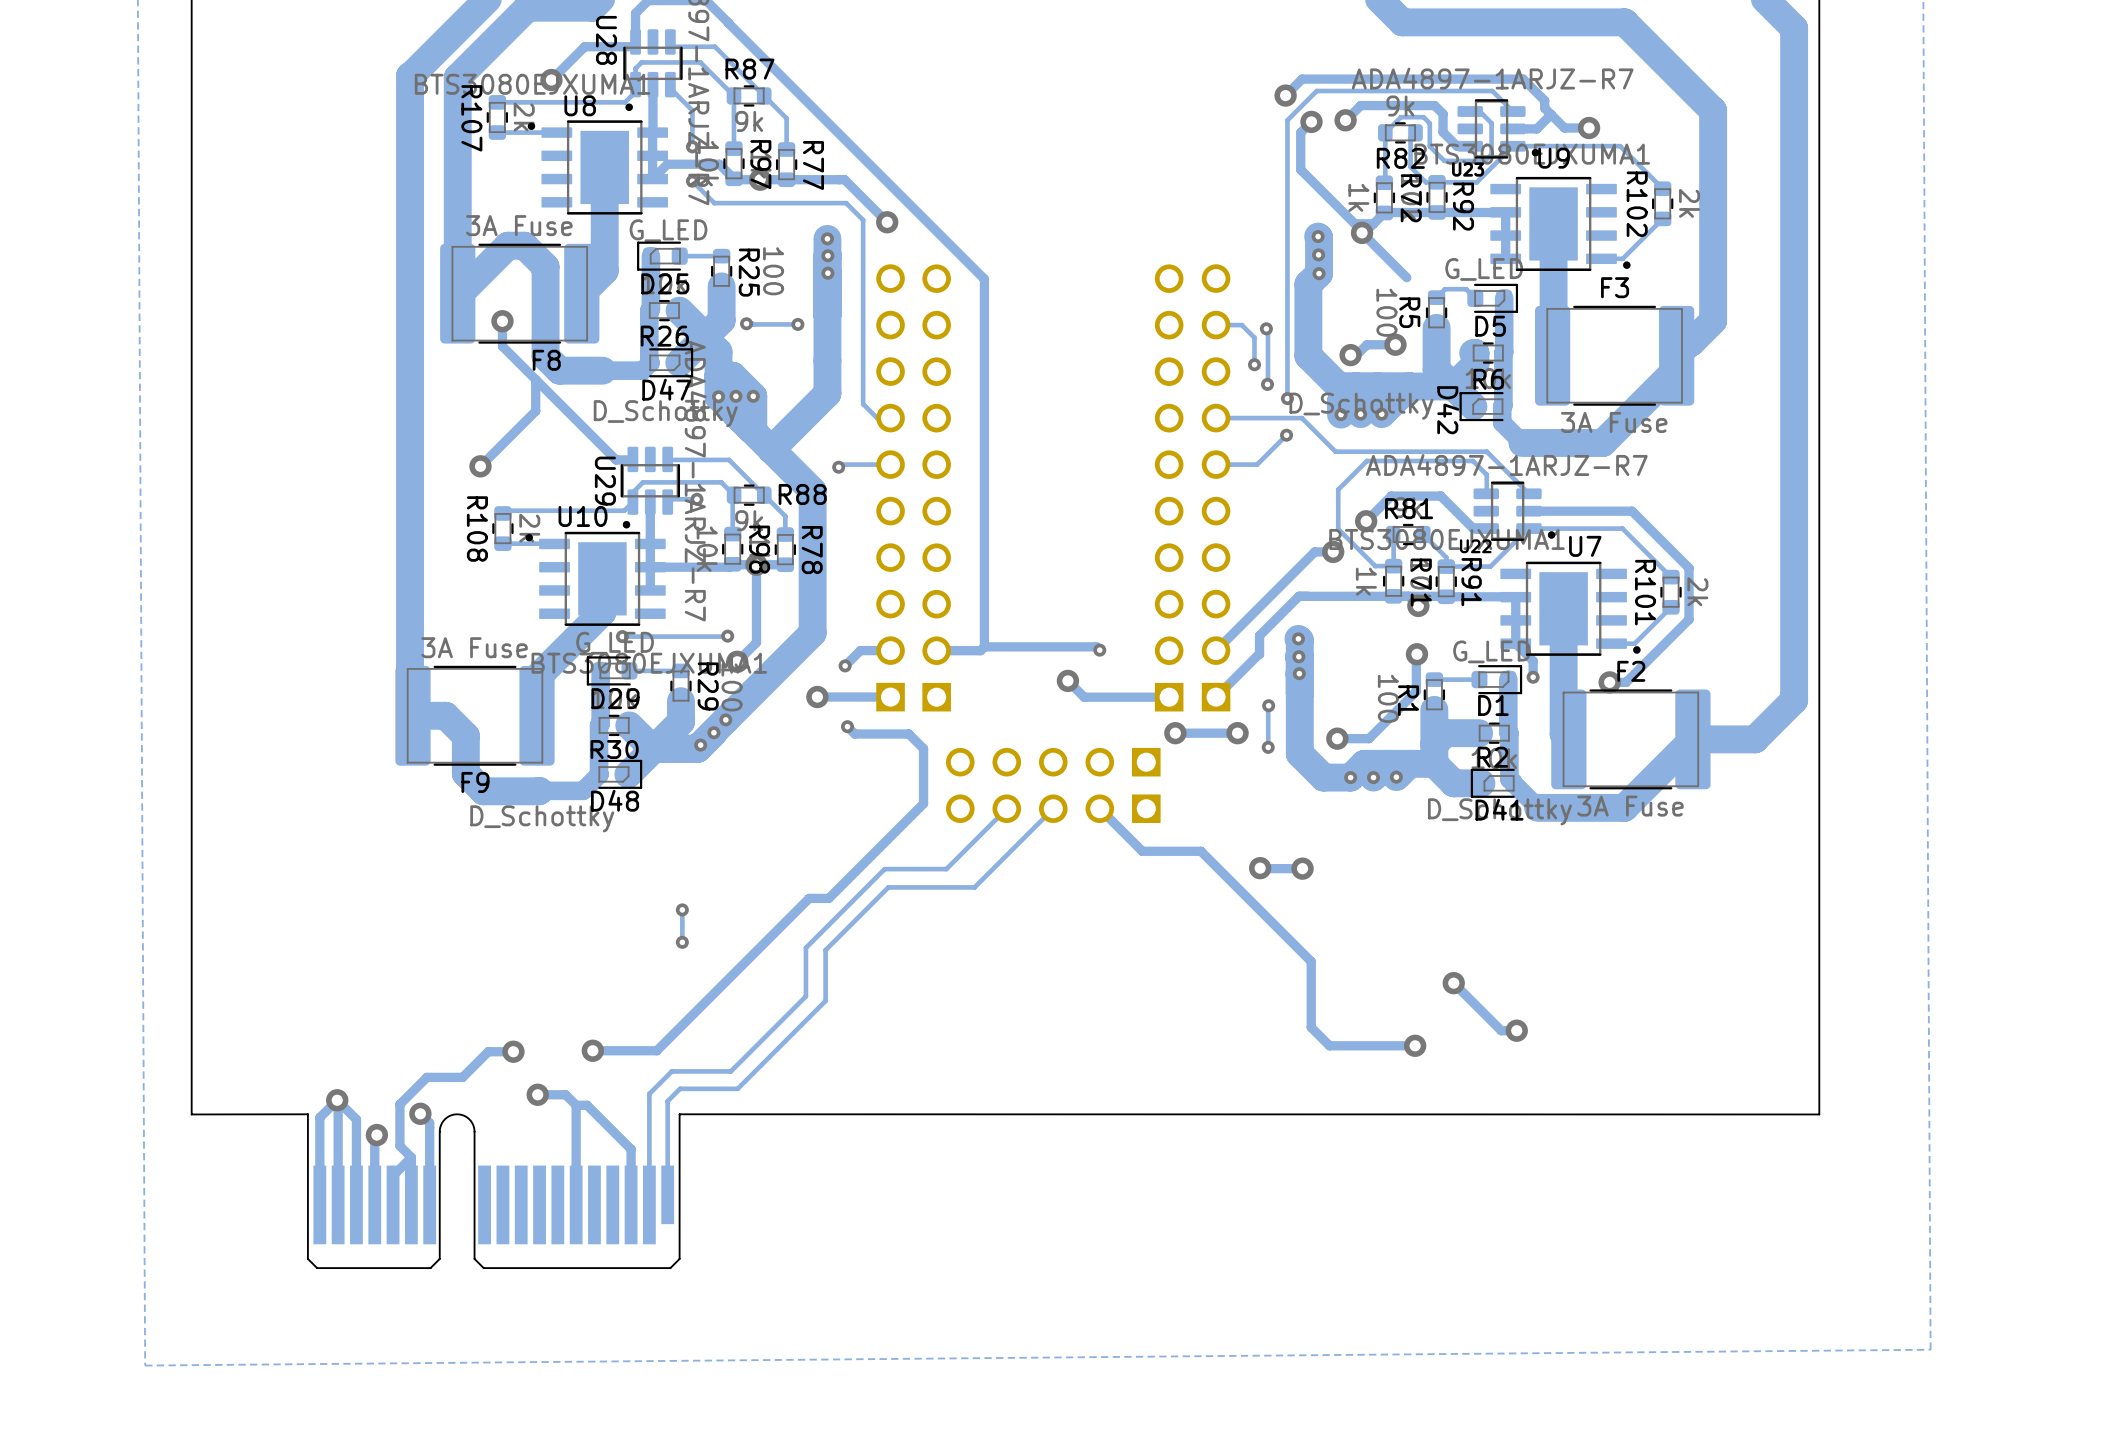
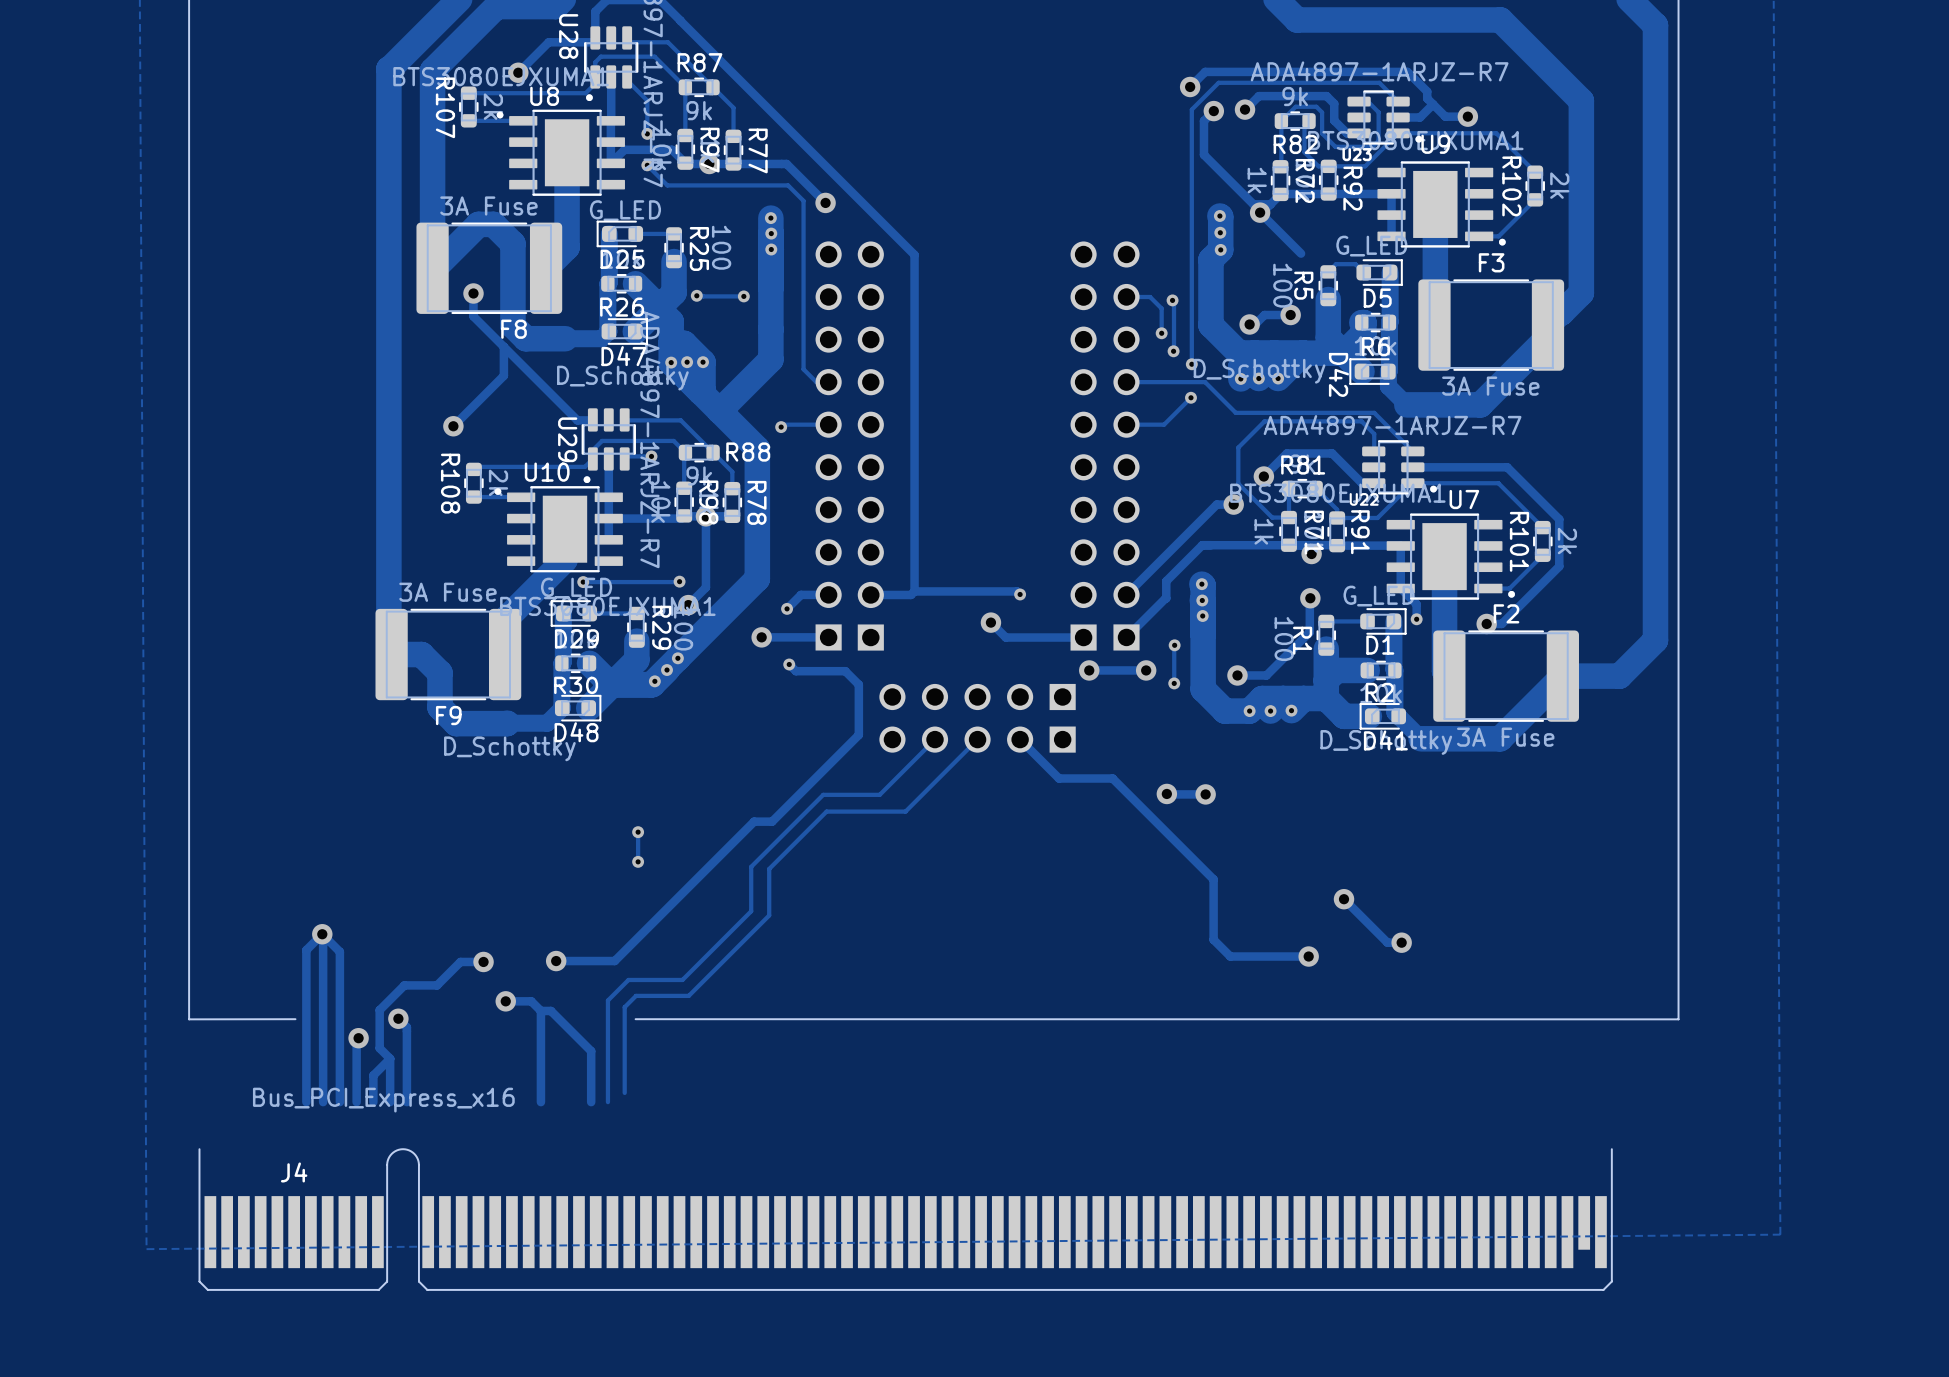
track: none -> (323, 935) (323, 1007)
via position: (337, 1100) -> (322, 934)
track: (319, 1117) (337, 1100) (356, 1119) -> (306, 1022) (306, 950) (322, 934) (339, 951) (339, 1023)
part: (493, 1191) -> none
J4: none -> Bus_PCI_Express_x16 (905, 1219)

